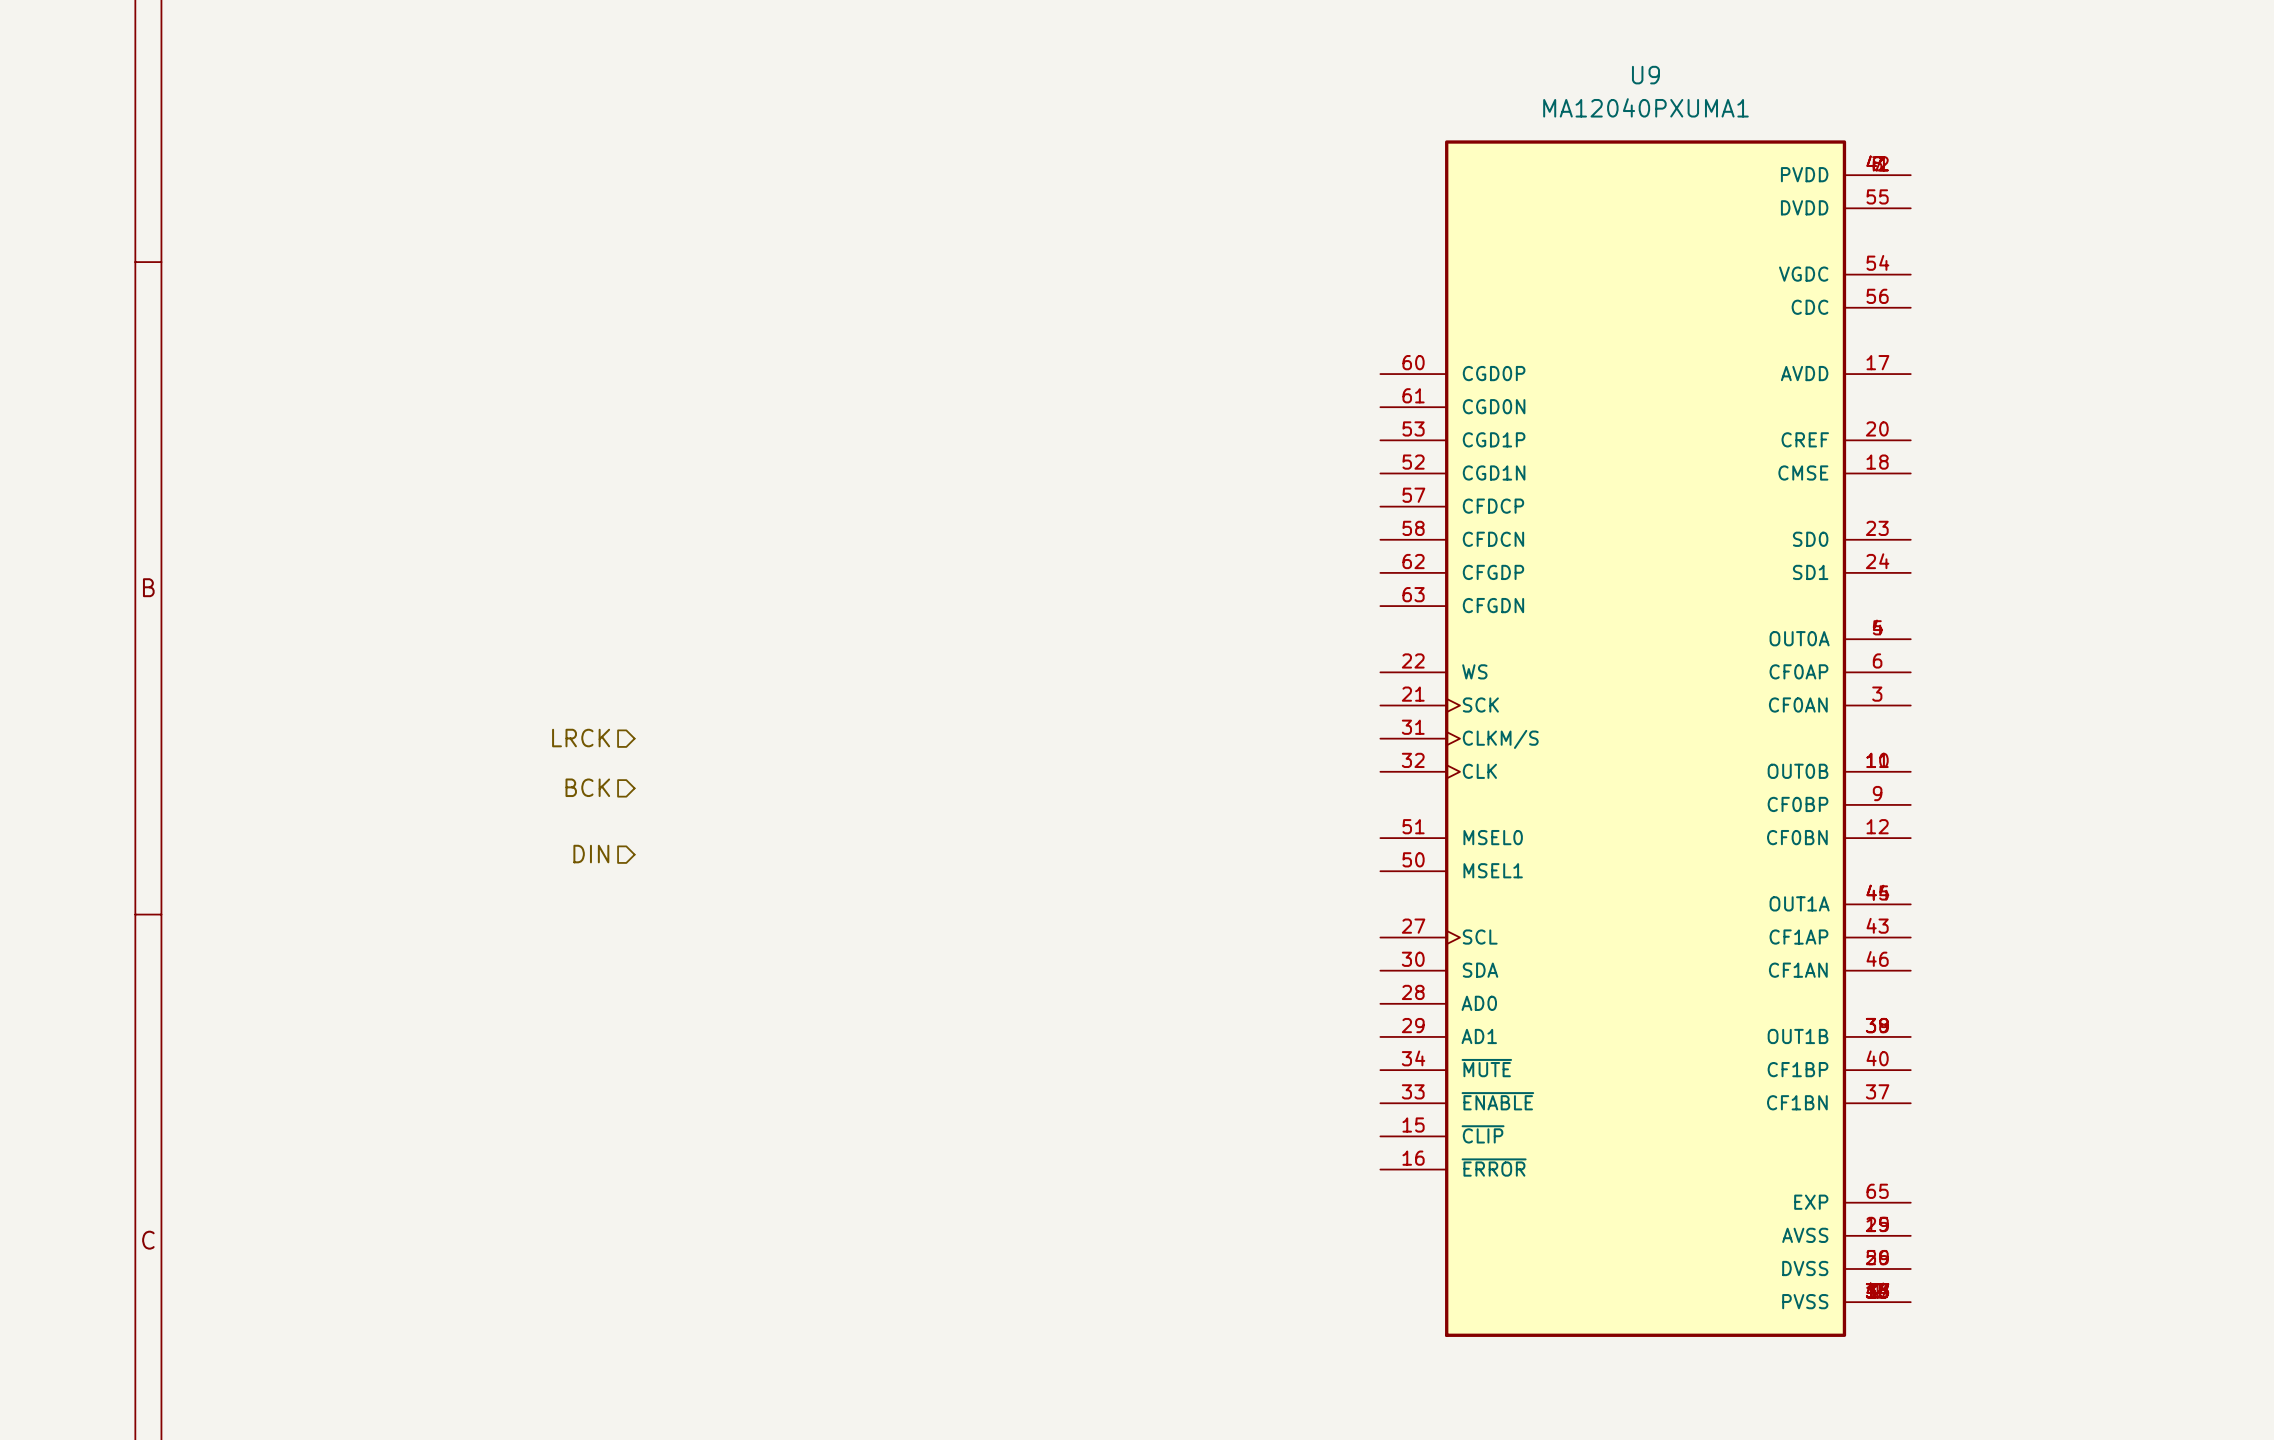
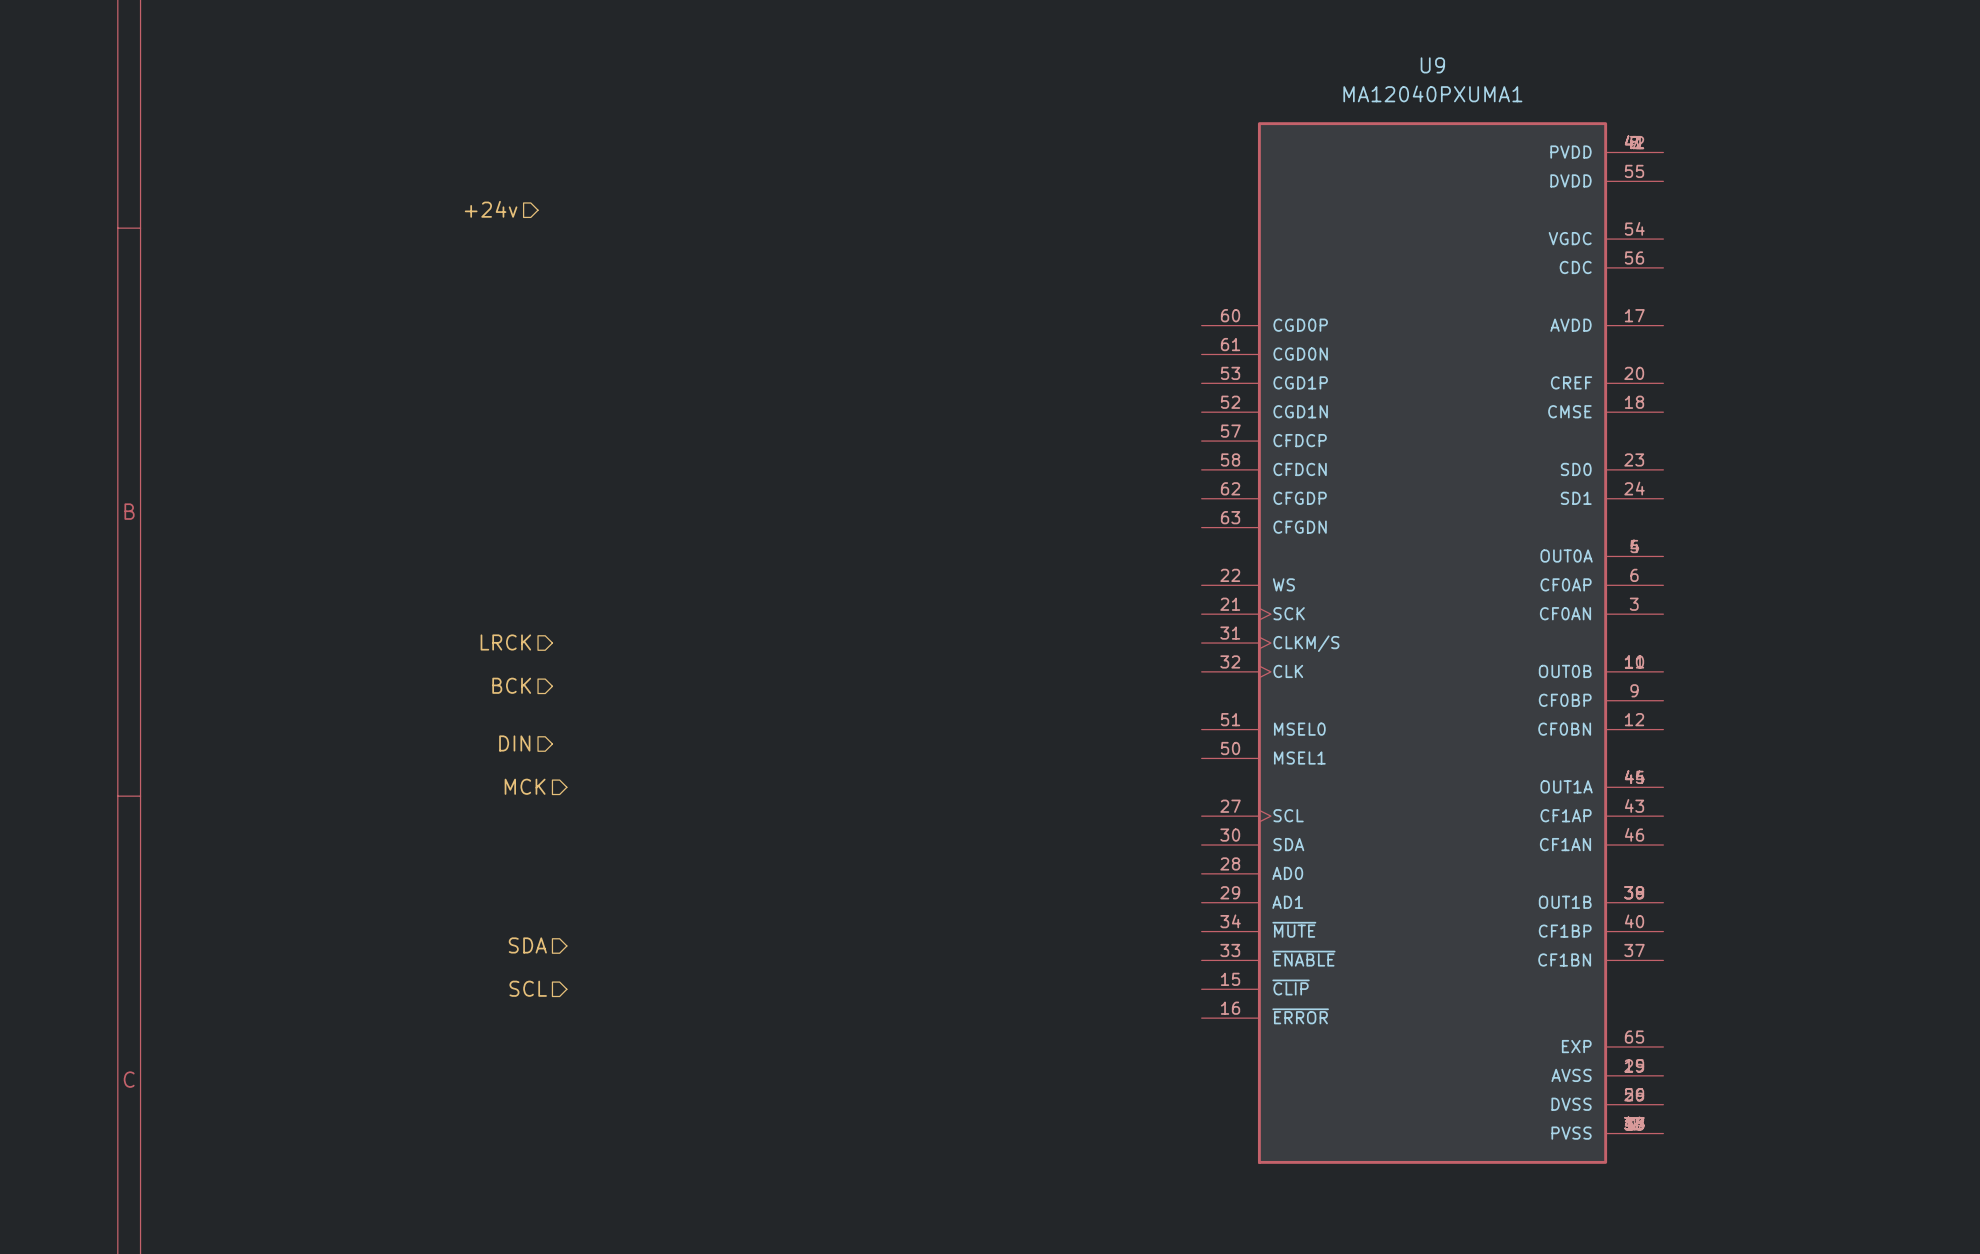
hierarchical label: none -> +24v (491, 209)
hierarchical label: none -> MCK (525, 786)
hierarchical label: none -> SDA (527, 945)
hierarchical label: none -> SCL (528, 988)

